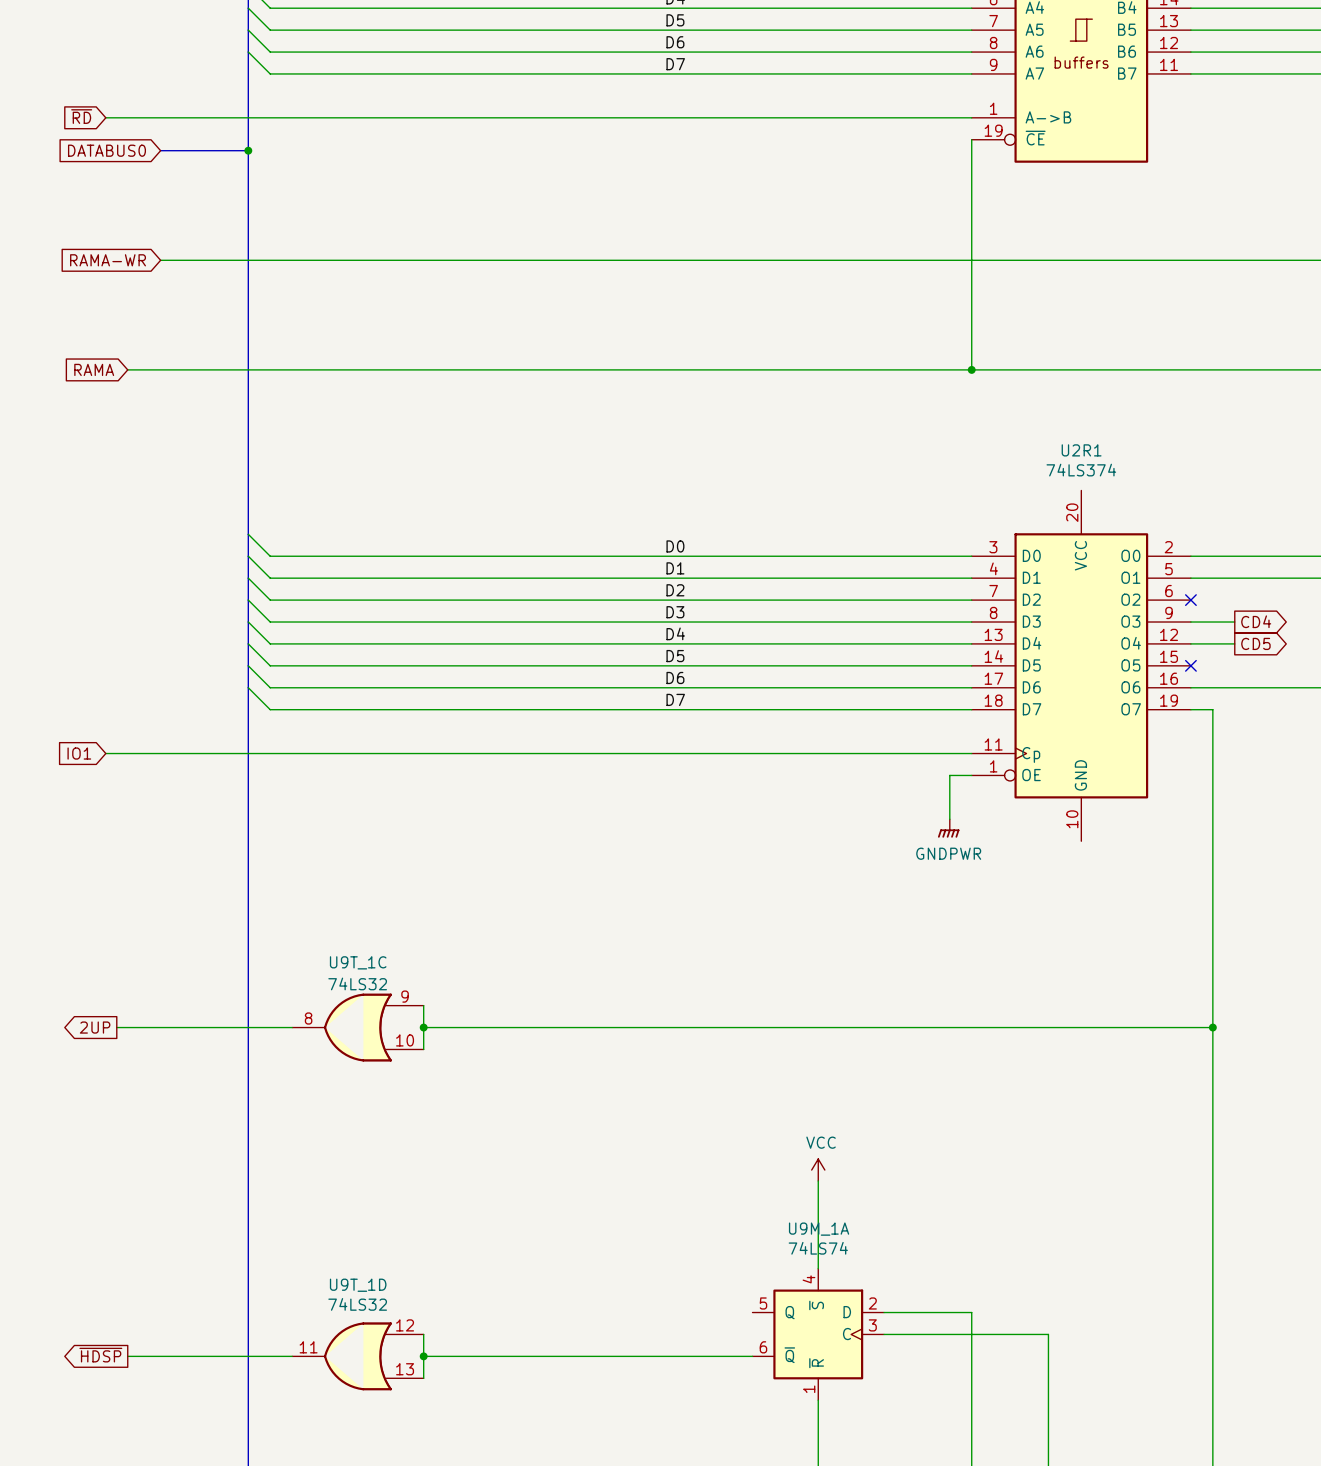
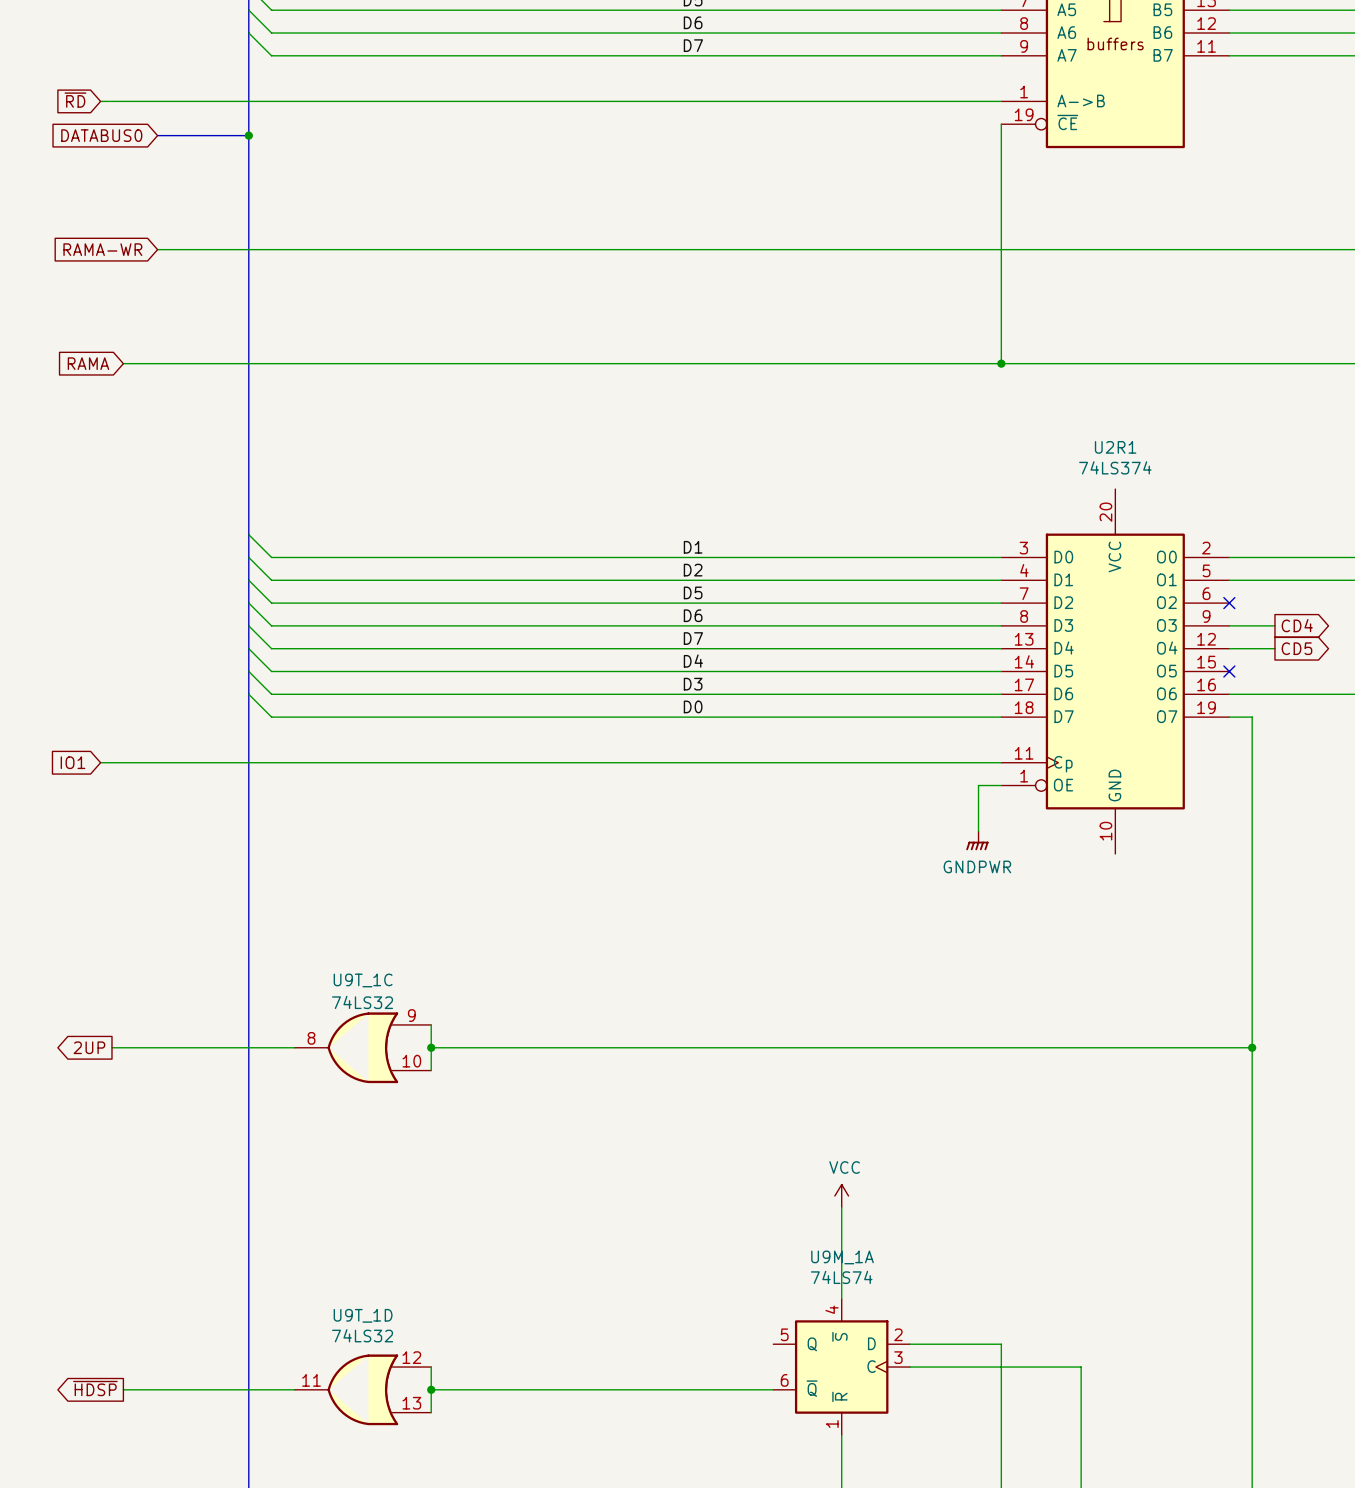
label: D0 (675, 546) -> D1 (693, 547)
label: D1 (675, 568) -> D2 (693, 570)
label: D2 (675, 590) -> D5 (693, 592)
label: D3 (675, 612) -> D6 (693, 615)
label: D4 (675, 633) -> D7 (693, 638)
label: D5 (675, 656) -> D4 (693, 661)
label: D6 (675, 677) -> D3 (693, 684)
label: D7 (675, 699) -> D0 (693, 706)

